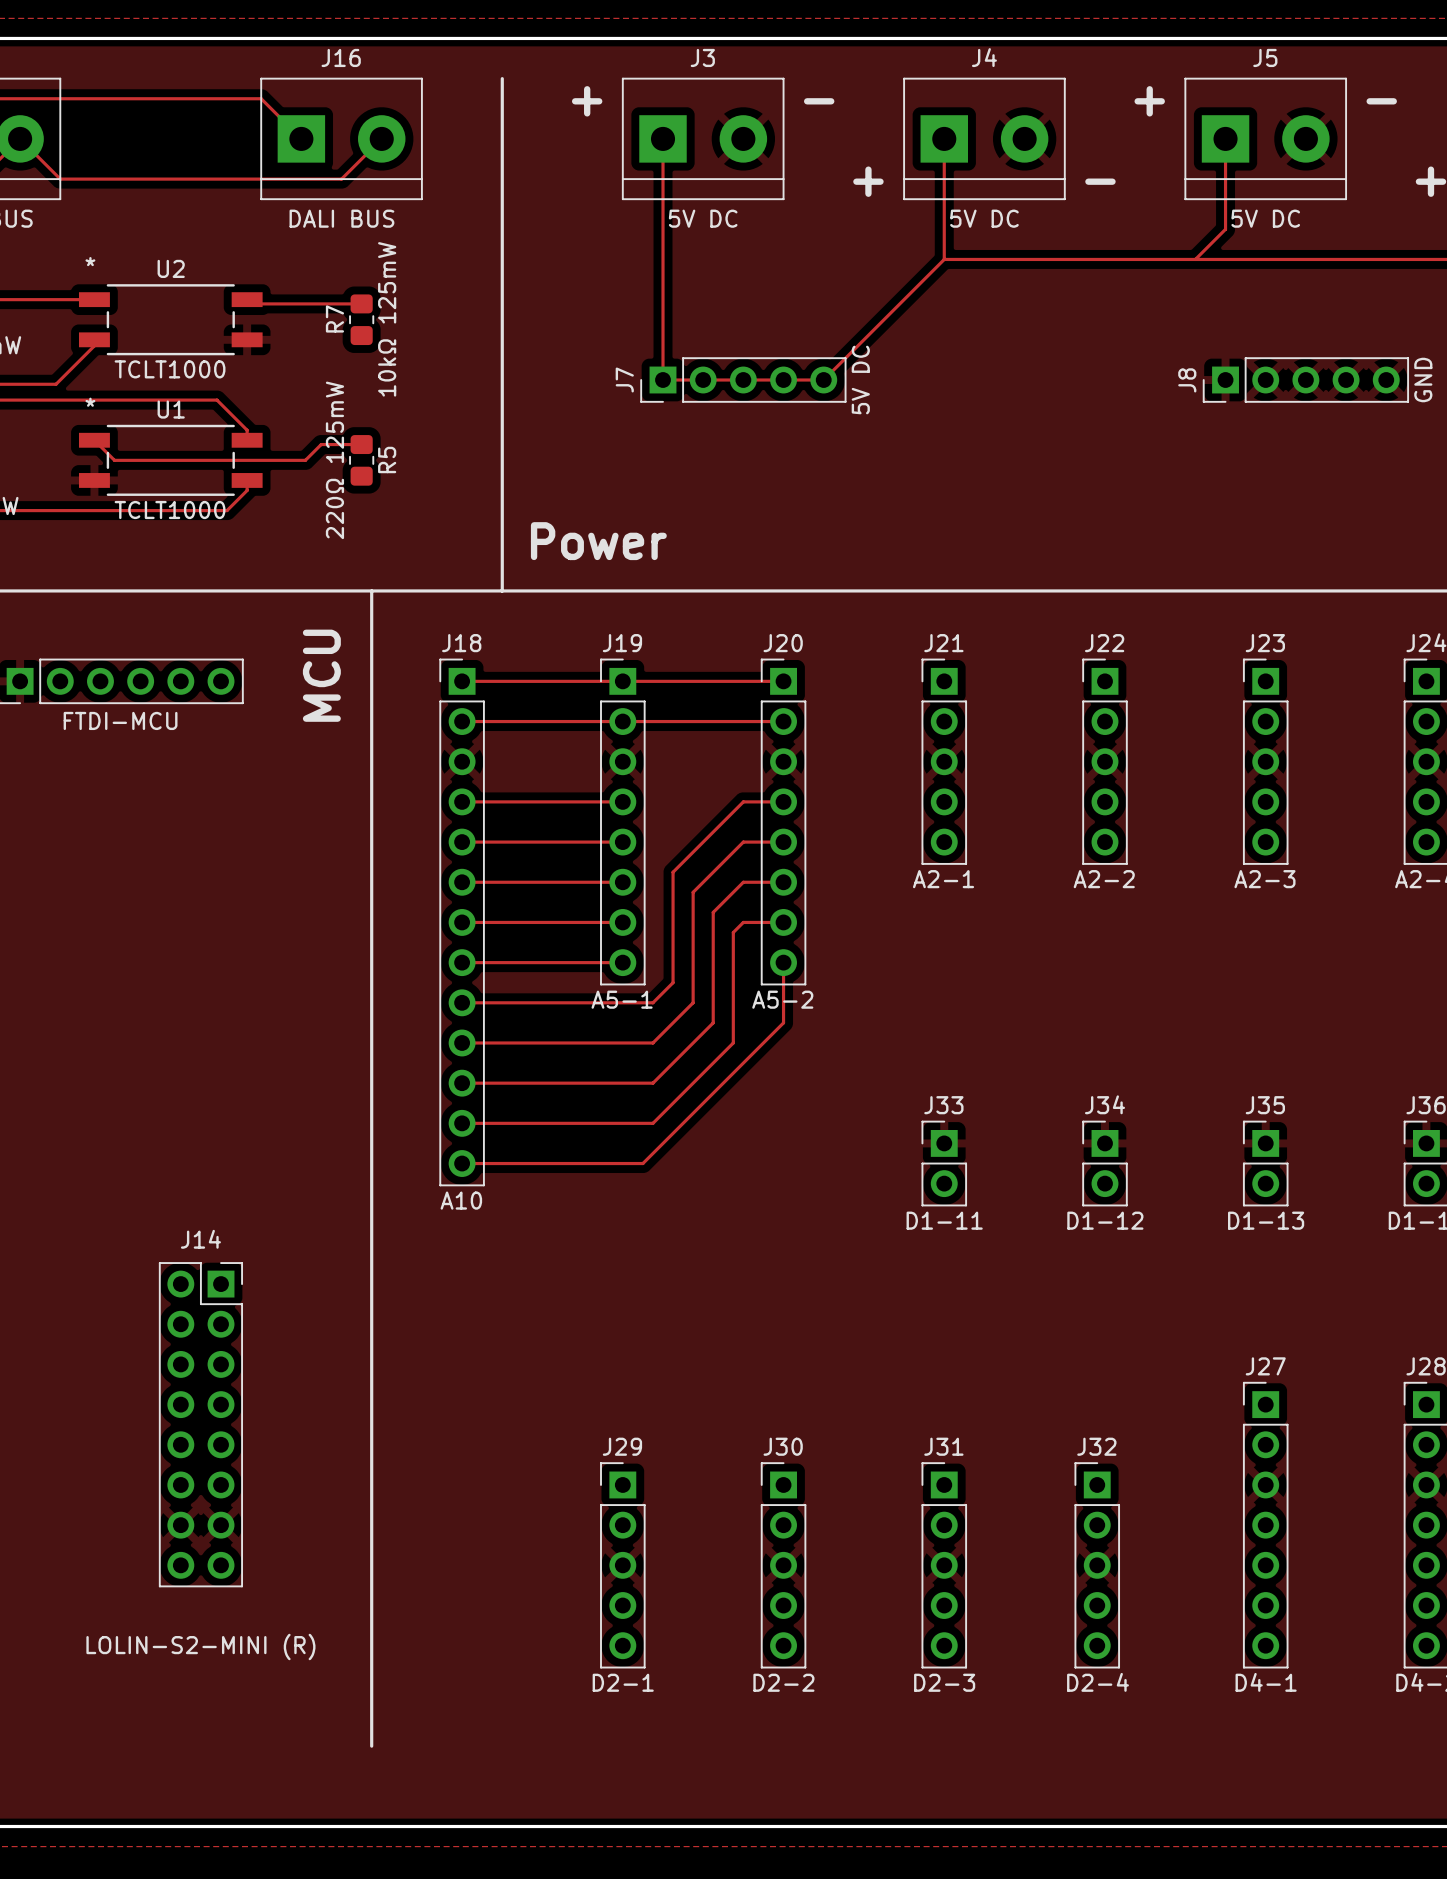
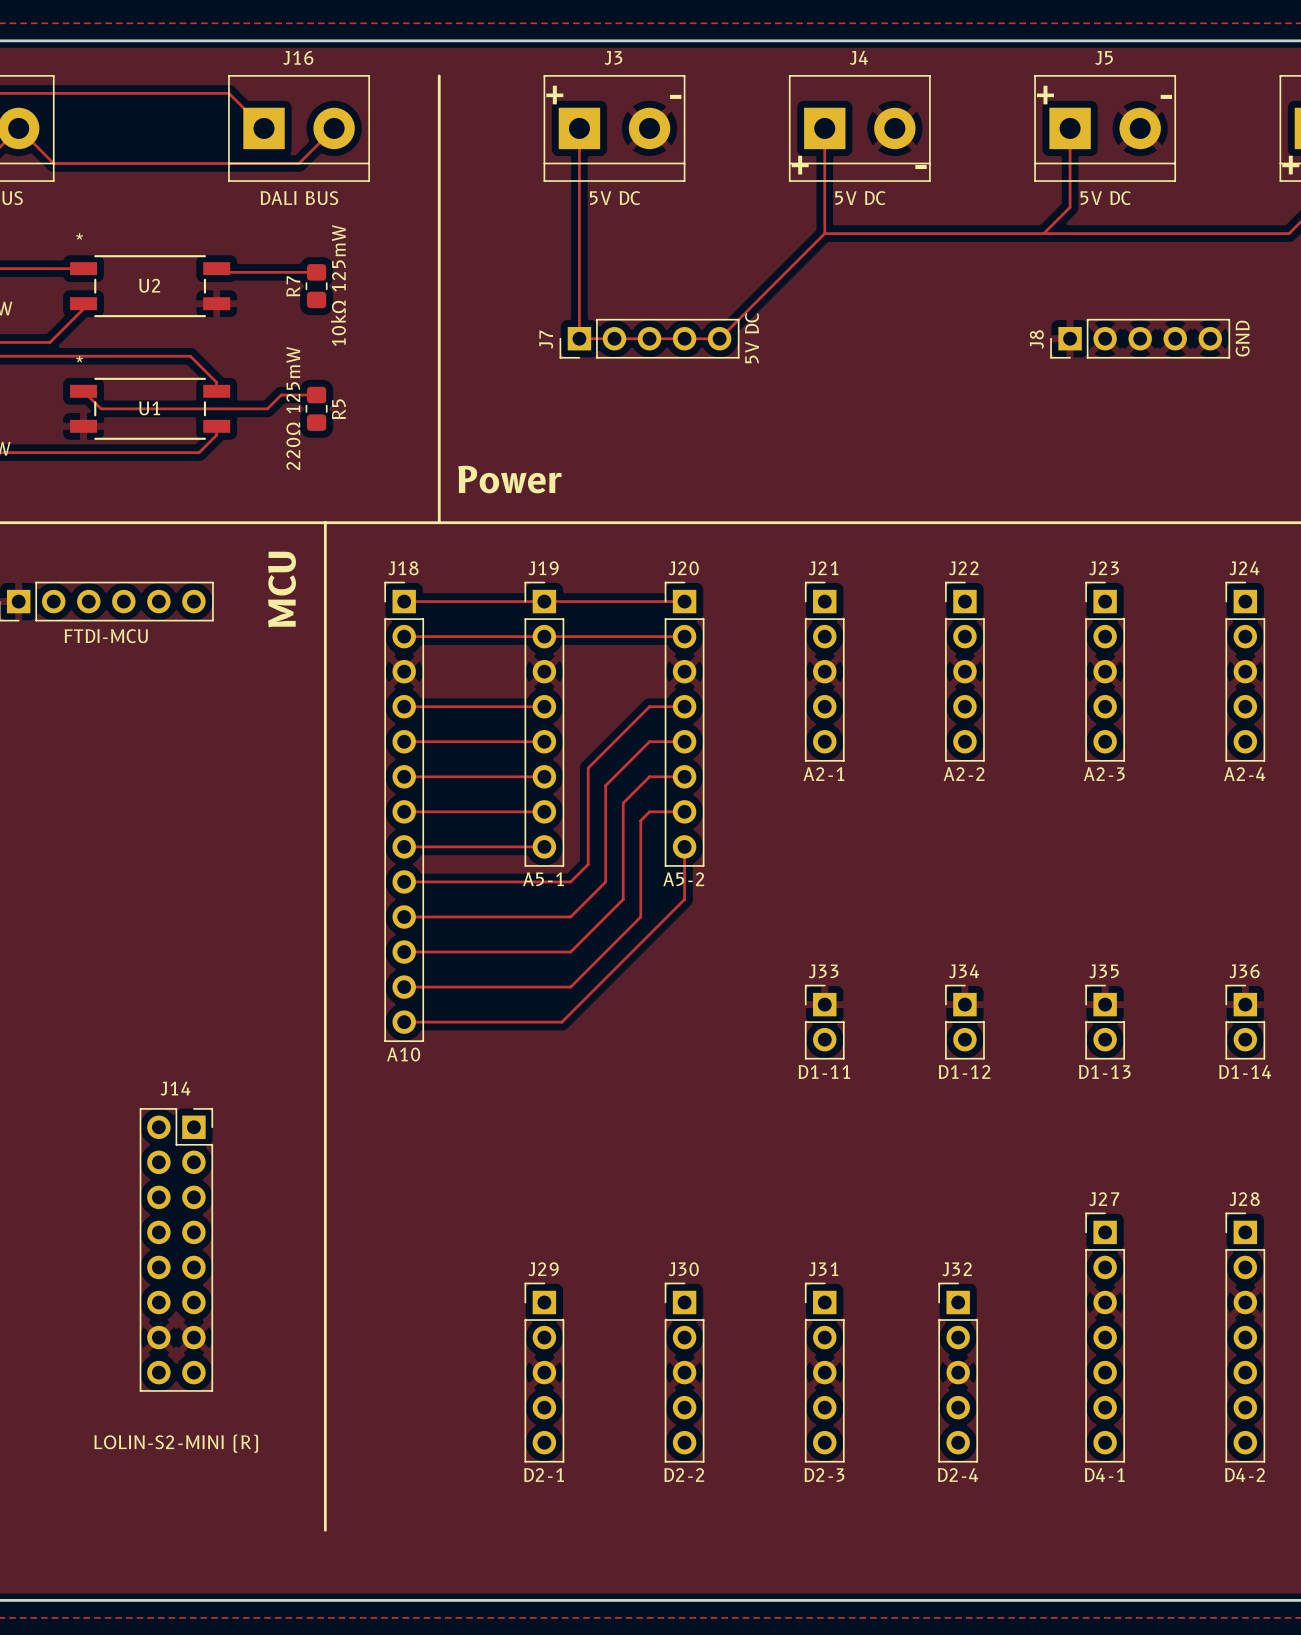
U2 name position: U2 (171, 268) -> U2 (149, 285)
U2 value: TCLT1000 (170, 369) -> none
U1 name position: U1 (171, 409) -> U1 (149, 408)
U1 value: TCLT1000 (170, 510) -> none

